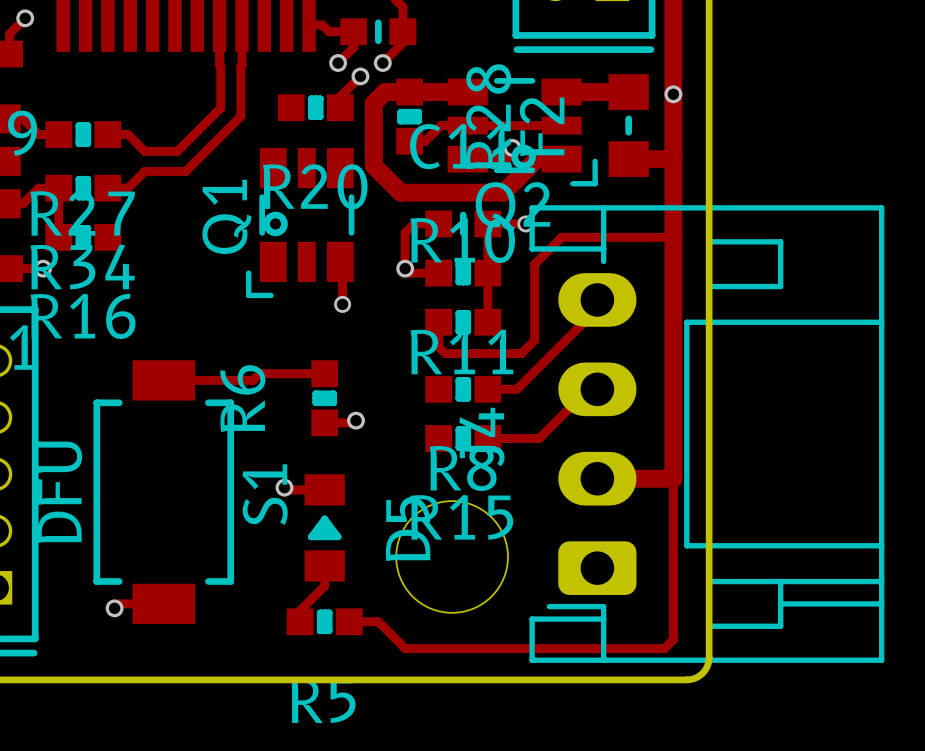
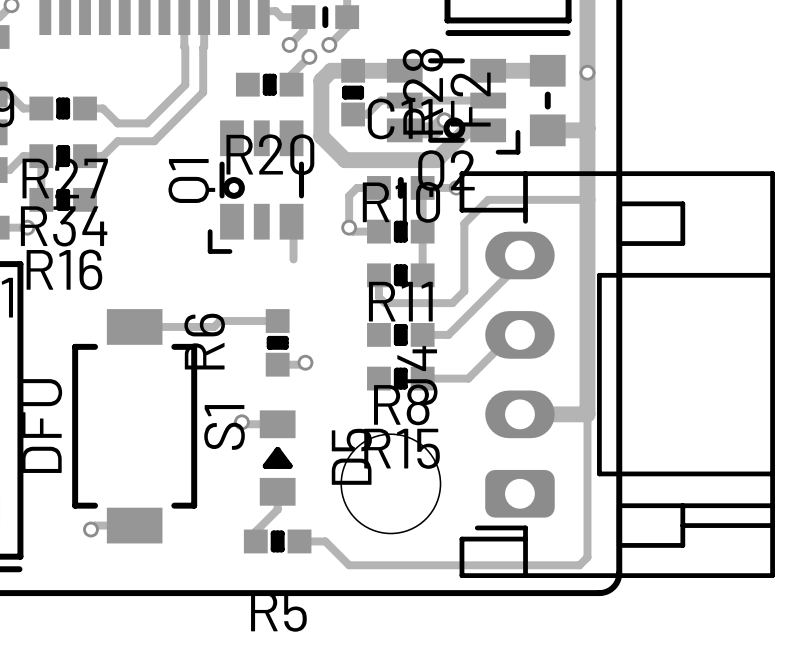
via: (342, 304) -> none

